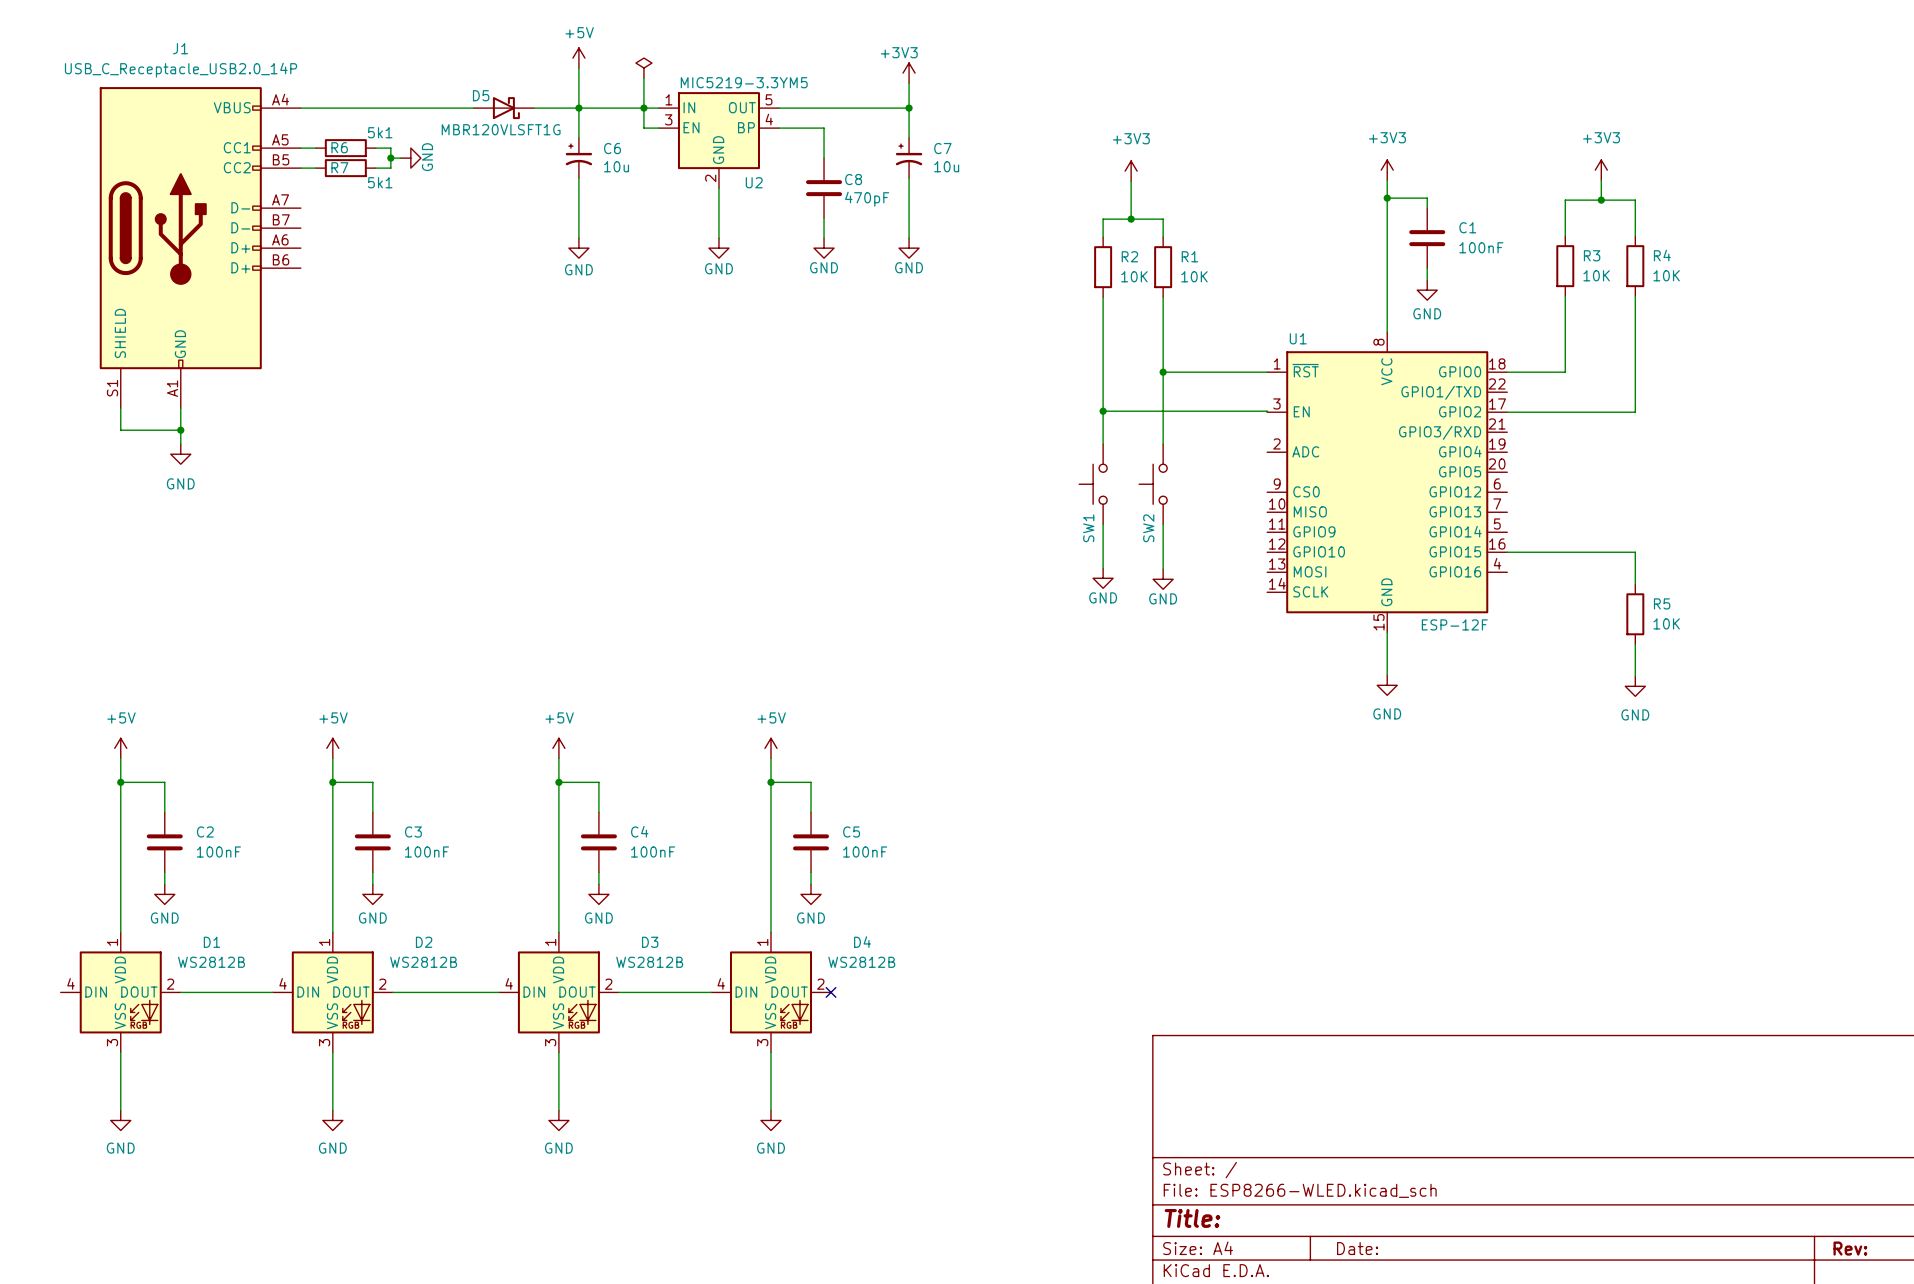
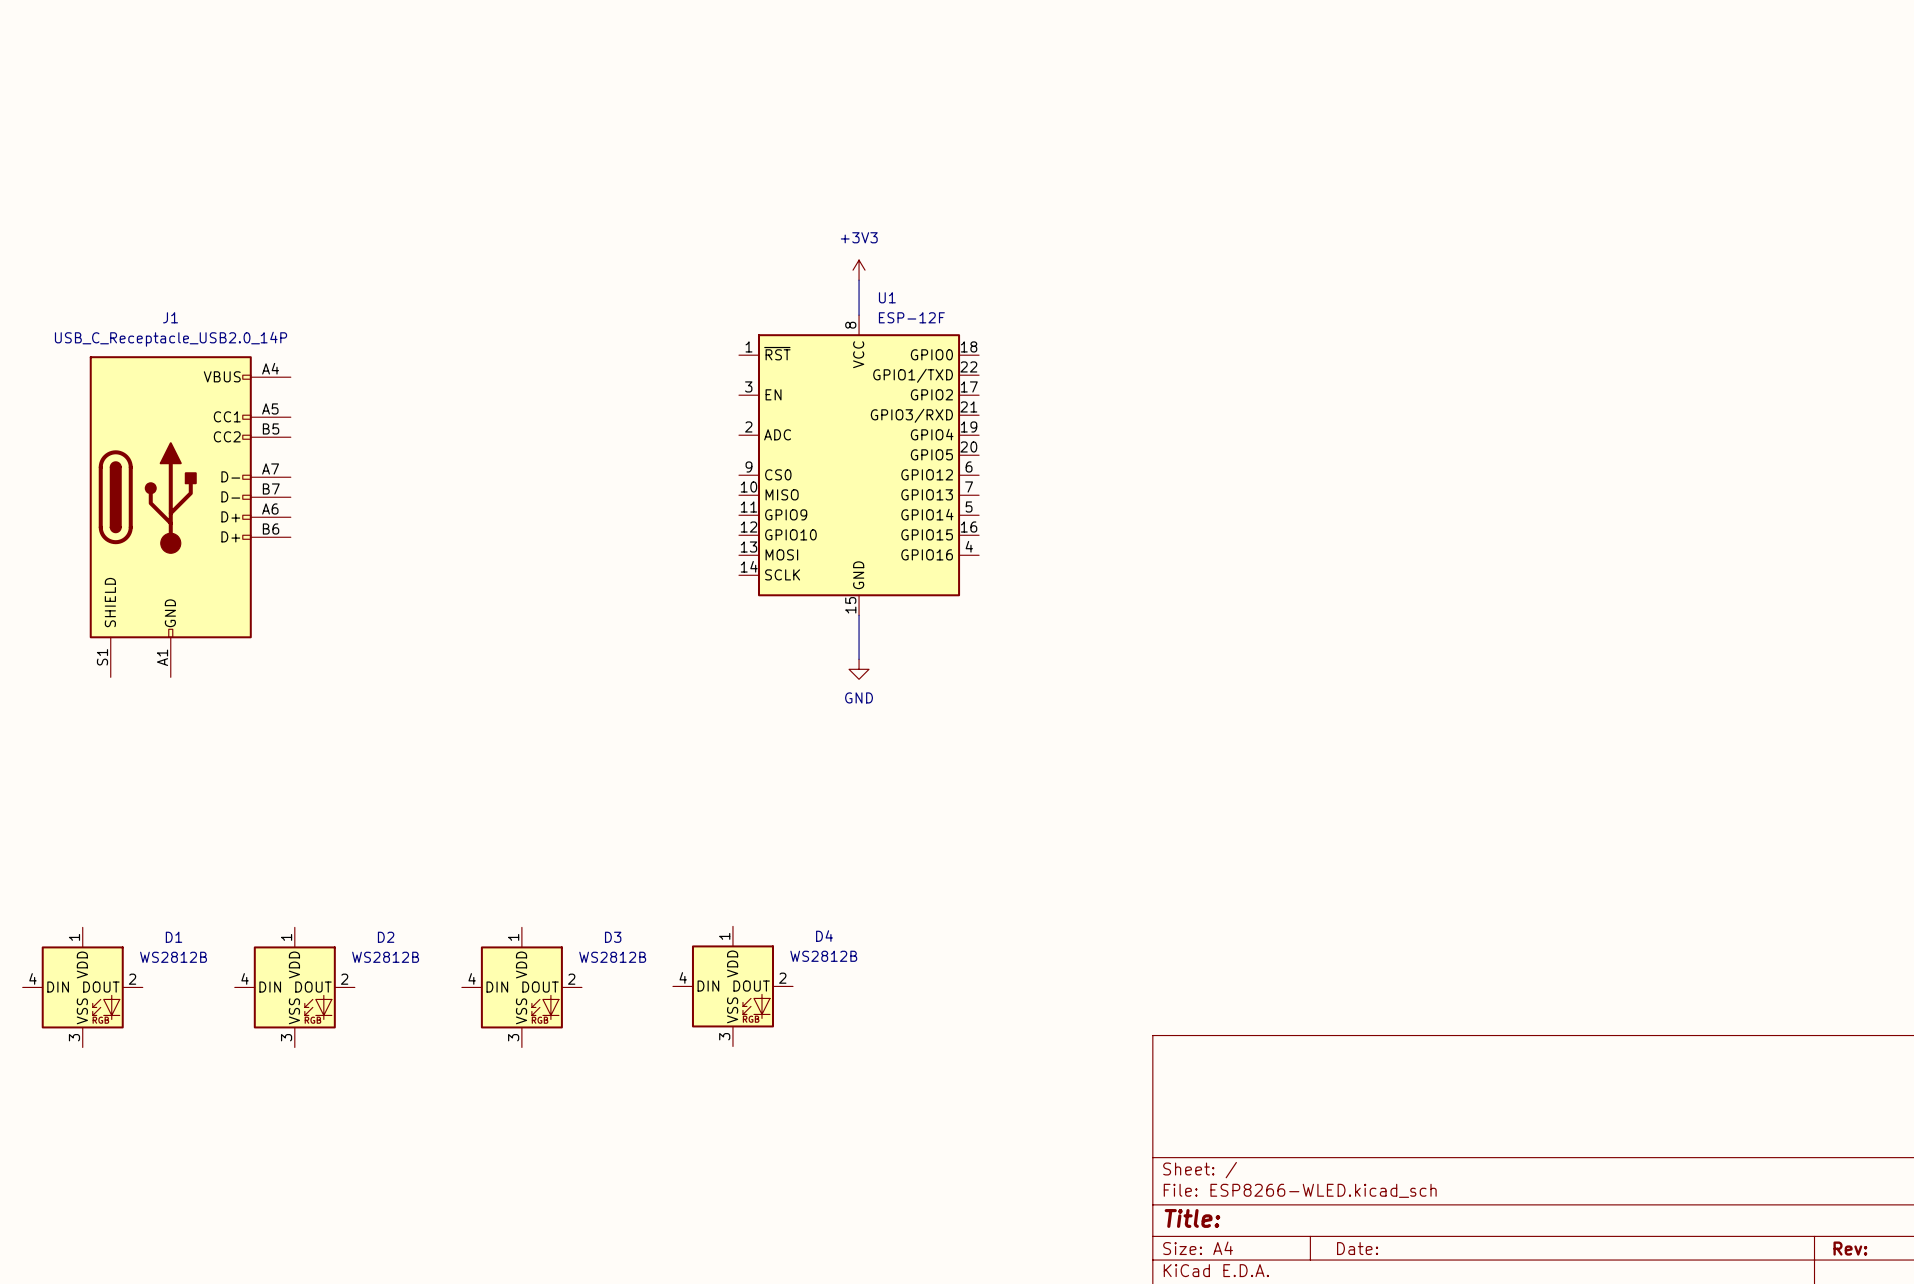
power symbol: +5V (578, 58) -> none
wire: (578, 68) (578, 138) -> none
power symbol: (643, 68) -> none
power symbol: +3V3 (909, 73) -> none
wire: (643, 78) (643, 128) (658, 128) -> none
wire: (909, 83) (909, 138) -> none
wire: (300, 108) (473, 108) -> none
D5: MBR120VLSFT1G (503, 108) -> none
wire: (533, 108) (658, 108) -> none
junction: (578, 108) -> none
junction: (643, 108) -> none
wire: (779, 108) (909, 108) -> none
junction: (909, 108) -> none
wire: (779, 128) (824, 128) (824, 158) -> none
U2: MIC5219-3.3YM5 (718, 140) -> none
wire: (300, 148) (315, 148) -> none
R6: 5k1 (345, 148) -> none
wire: (375, 148) (390, 148) (390, 168) (375, 168) -> none
wire: (390, 158) (400, 158) -> none
junction: (390, 158) -> none
power symbol: GND (410, 158) -> none
C6: 10u (578, 158) -> none
C7: 10u (909, 158) -> none
wire: (300, 168) (315, 168) -> none
R7: 5k1 (345, 168) -> none
power symbol: +3V3 (1387, 170) -> none
power symbol: +3V3 (1601, 170) -> none
power symbol: +3V3 (1131, 171) -> none
wire: (578, 178) (578, 238) -> none
wire: (909, 178) (909, 238) -> none
wire: (1387, 180) (1387, 332) -> none
wire: (1601, 180) (1601, 200) -> none
wire: (1131, 181) (1131, 219) -> none
wire: (718, 188) (718, 238) -> none
C8: 470pF (824, 188) -> none
wire: (1387, 198) (1427, 198) (1427, 208) -> none
junction: (1387, 198) -> none
junction: (1601, 200) -> none
wire: (824, 218) (824, 238) -> none
junction: (1131, 219) -> none
wire: (1565, 236) (1565, 200) (1635, 200) (1635, 236) -> none
wire: (1103, 237) (1103, 219) (1163, 219) (1163, 237) -> none
C1: 100nF (1427, 238) -> none
J1 position: (200, 247) -> (190, 516)
power symbol: GND (578, 248) -> none
power symbol: GND (718, 248) -> none
power symbol: GND (824, 248) -> none
power symbol: GND (909, 248) -> none
R3: 10K (1565, 266) -> none
R4: 10K (1635, 266) -> none
R2: 10K (1103, 267) -> none
R1: 10K (1163, 267) -> none
wire: (1427, 268) (1427, 280) -> none
power symbol: none -> +3V3 (859, 270)
wire: none -> (859, 280) (859, 315)
power symbol: GND (1427, 290) -> none
wire: (1565, 296) (1565, 372) (1507, 372) -> none
wire: (1635, 296) (1635, 412) (1507, 412) -> none
wire: (1103, 297) (1103, 444) -> none
wire: (1163, 297) (1163, 444) -> none
U1 name position: U1 (1298, 338) -> U1 (887, 297)
wire: (1163, 372) (1267, 372) -> none
junction: (1163, 372) -> none
wire: (1103, 411) (1267, 412) -> none
junction: (1103, 411) -> none
junction: (180, 430) -> none
power symbol: GND (180, 454) -> none
U1 position: (1387, 482) -> (859, 465)
SW1: (1093, 484) -> none
SW2: (1153, 484) -> none
wire: (1103, 524) (1103, 568) -> none
wire: (1163, 524) (1163, 569) -> none
wire: (1507, 552) (1635, 552) (1635, 584) -> none
power symbol: GND (1103, 578) -> none
power symbol: GND (1163, 579) -> none
R5: 10K (1635, 614) -> none
wire: none -> (859, 615) (859, 659)
U1 value position: ESP-12F (1454, 624) -> ESP-12F (911, 317)
wire: (1387, 632) (1387, 675) -> none
wire: (1635, 644) (1635, 676) -> none
power symbol: none -> GND (859, 669)
power symbol: GND (1387, 685) -> none
power symbol: GND (1635, 686) -> none
power symbol: +5V (120, 748) -> none
power symbol: +5V (332, 748) -> none
power symbol: +5V (558, 748) -> none
power symbol: +5V (770, 748) -> none
wire: (120, 758) (120, 932) -> none
wire: (332, 758) (332, 932) -> none
wire: (558, 758) (558, 932) -> none
wire: (770, 758) (770, 932) -> none
wire: (120, 782) (164, 782) (164, 812) -> none
junction: (120, 782) -> none
wire: (332, 782) (372, 782) (372, 812) -> none
junction: (332, 782) -> none
wire: (558, 782) (598, 782) (598, 812) -> none
junction: (558, 782) -> none
wire: (770, 782) (811, 782) (811, 812) -> none
junction: (770, 782) -> none
C2: 100nF (164, 842) -> none
C3: 100nF (372, 842) -> none
C4: 100nF (598, 842) -> none
C5: 100nF (811, 842) -> none
wire: (164, 872) (164, 884) -> none
wire: (372, 872) (372, 884) -> none
wire: (598, 872) (598, 884) -> none
wire: (811, 872) (811, 884) -> none
power symbol: GND (164, 894) -> none
power symbol: GND (372, 894) -> none
power symbol: GND (598, 894) -> none
power symbol: GND (811, 894) -> none
D1 position: (120, 992) -> (82, 987)
wire: (180, 992) (272, 992) -> none
D2 position: (332, 992) -> (294, 987)
wire: (392, 992) (498, 992) -> none
D3 position: (558, 992) -> (521, 987)
wire: (618, 992) (710, 992) -> none
D4 position: (770, 992) -> (732, 986)
no-connect mark: (831, 992) -> none
wire: (120, 1052) (120, 1110) -> none
wire: (332, 1052) (332, 1110) -> none
wire: (558, 1052) (558, 1110) -> none
wire: (770, 1052) (770, 1110) -> none
power symbol: GND (120, 1120) -> none
power symbol: GND (332, 1120) -> none
power symbol: GND (558, 1120) -> none
power symbol: GND (770, 1120) -> none

